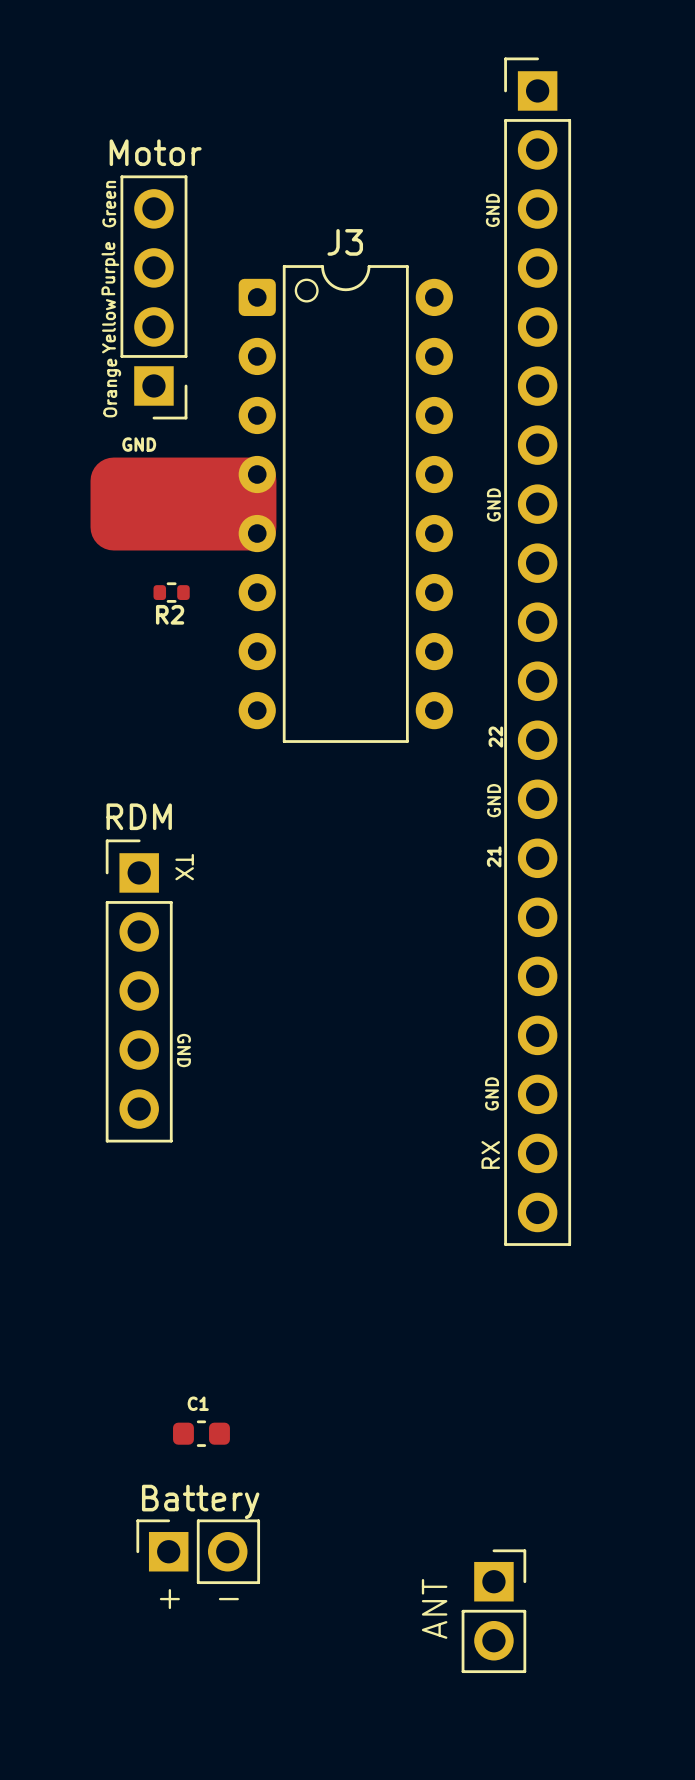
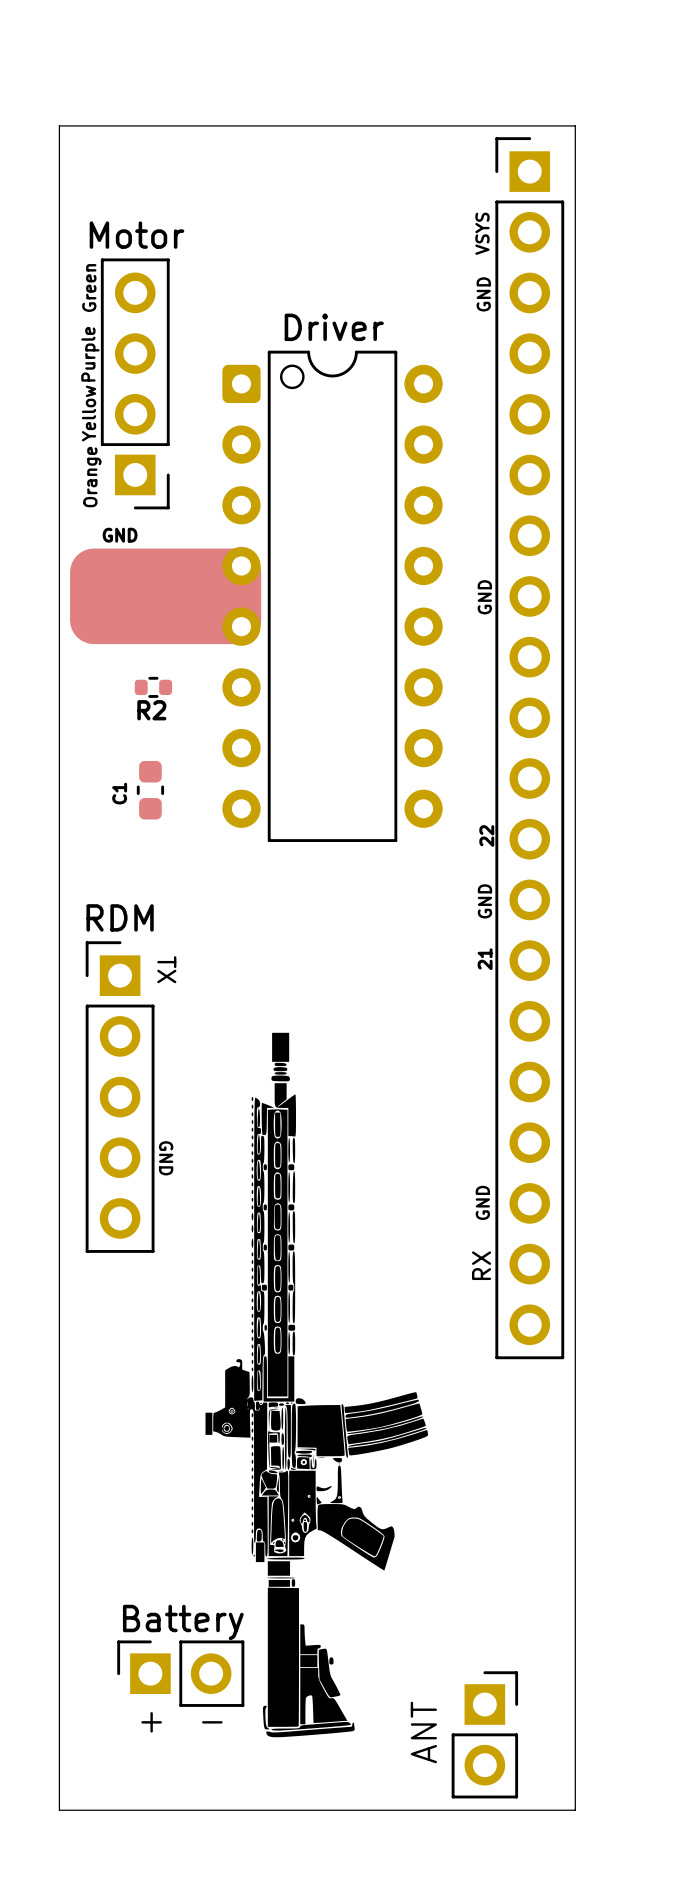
board edge: none -> (59, 125) (575, 125) (575, 1810) (59, 1810) (59, 125)
text: none -> VSYS (482, 233)
J3 name: J3 (345, 242) -> Driver (334, 327)
drawing: none -> [205, 1032, 429, 1738]
C1 rotation: 0° (201, 1433) -> 90° clockwise (150, 790)
C1 position: (201, 1433) -> (150, 790)

